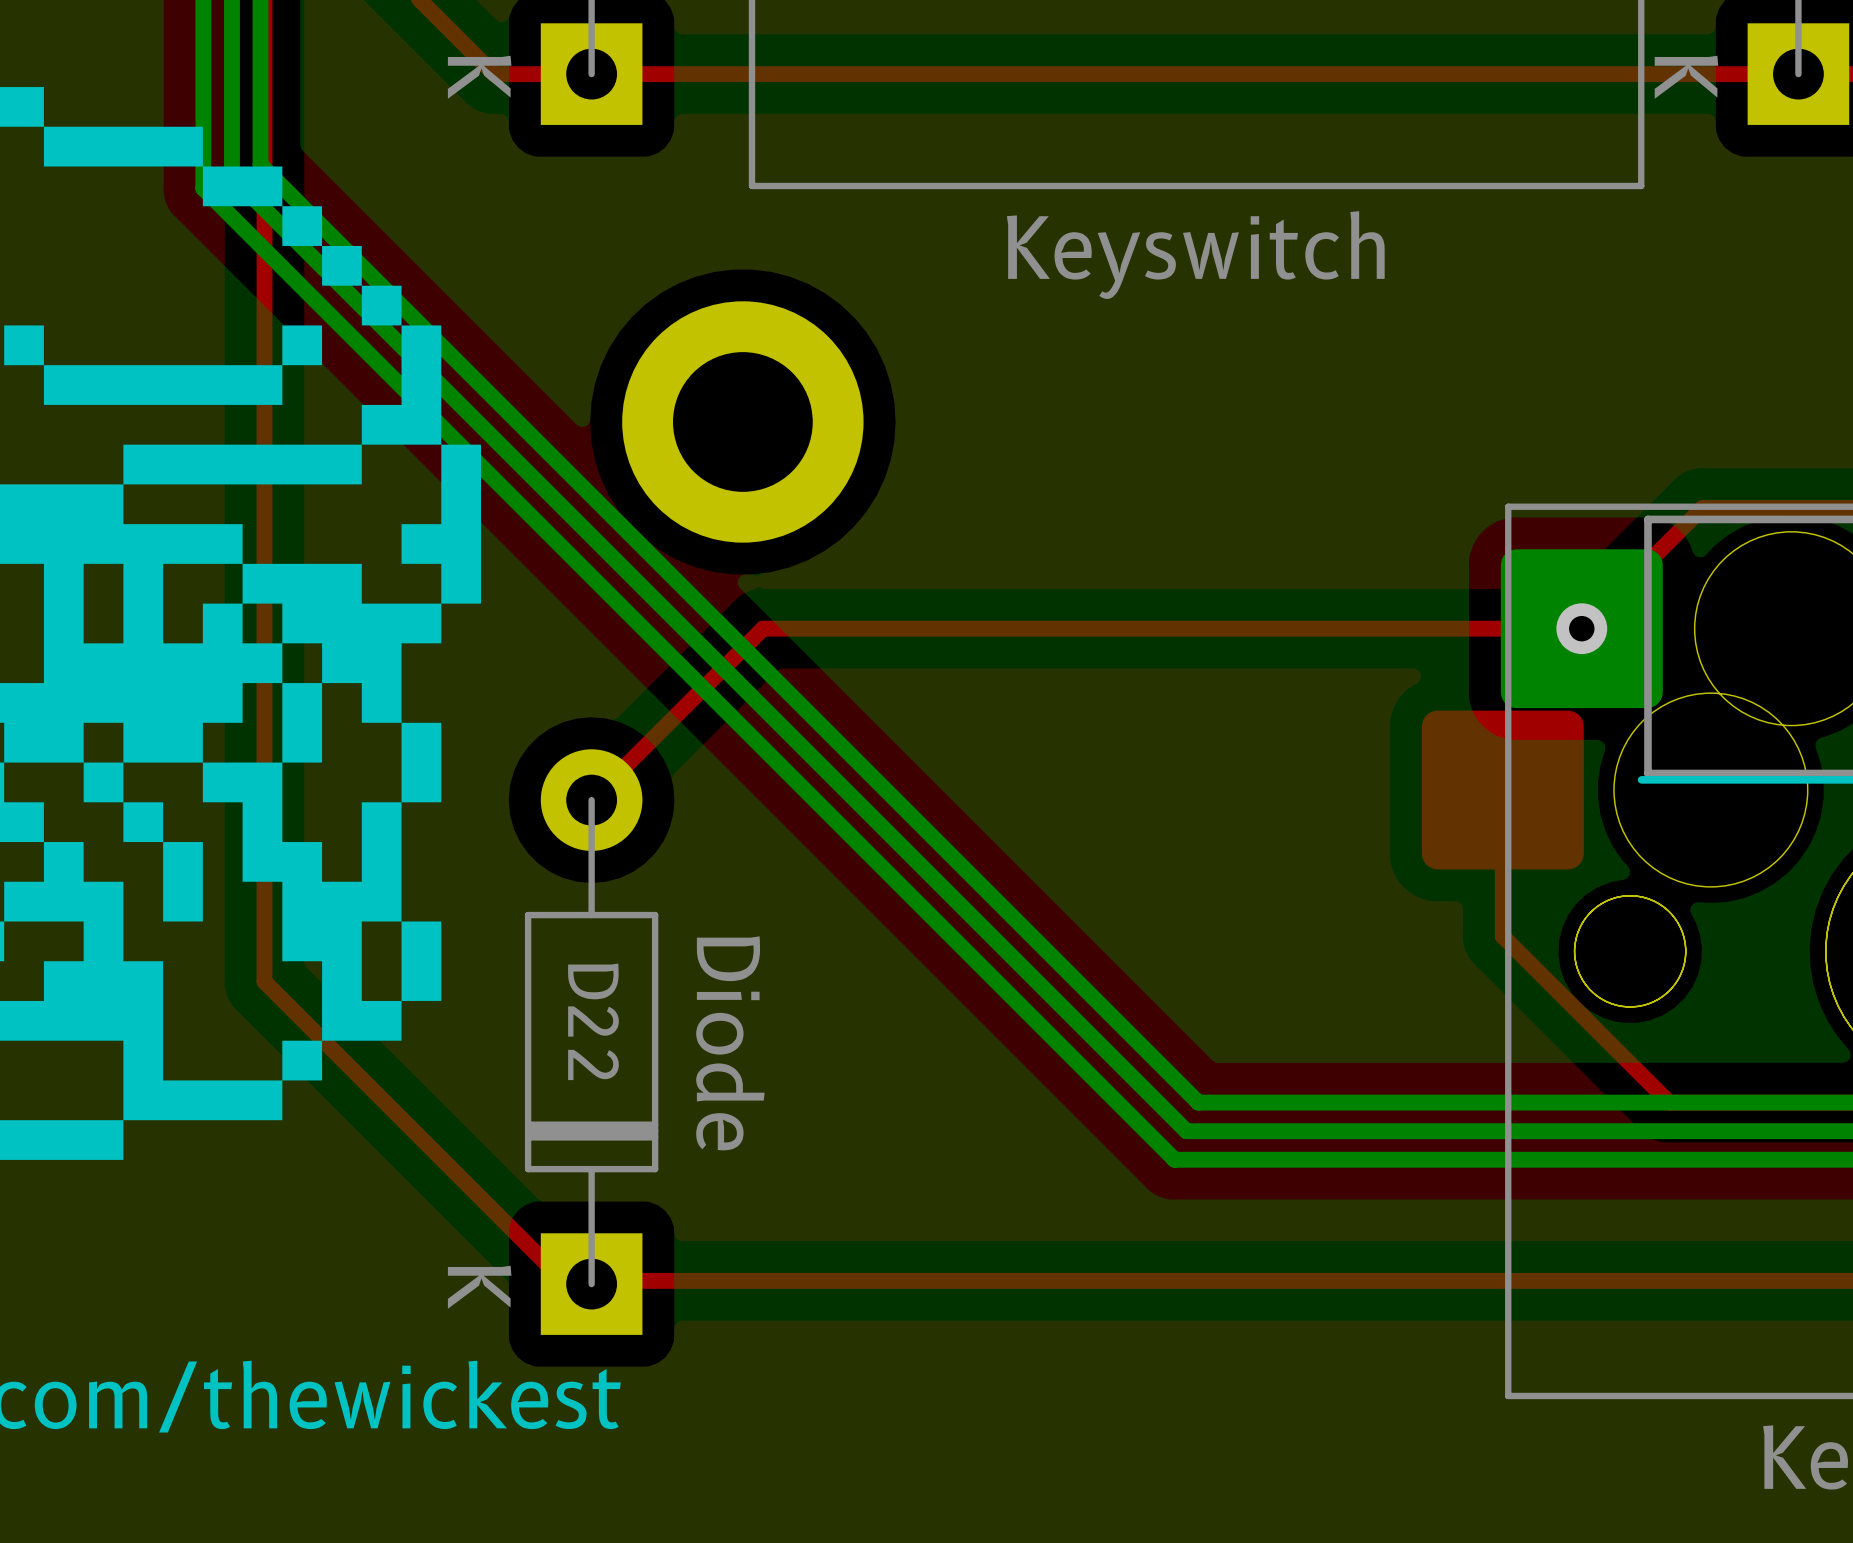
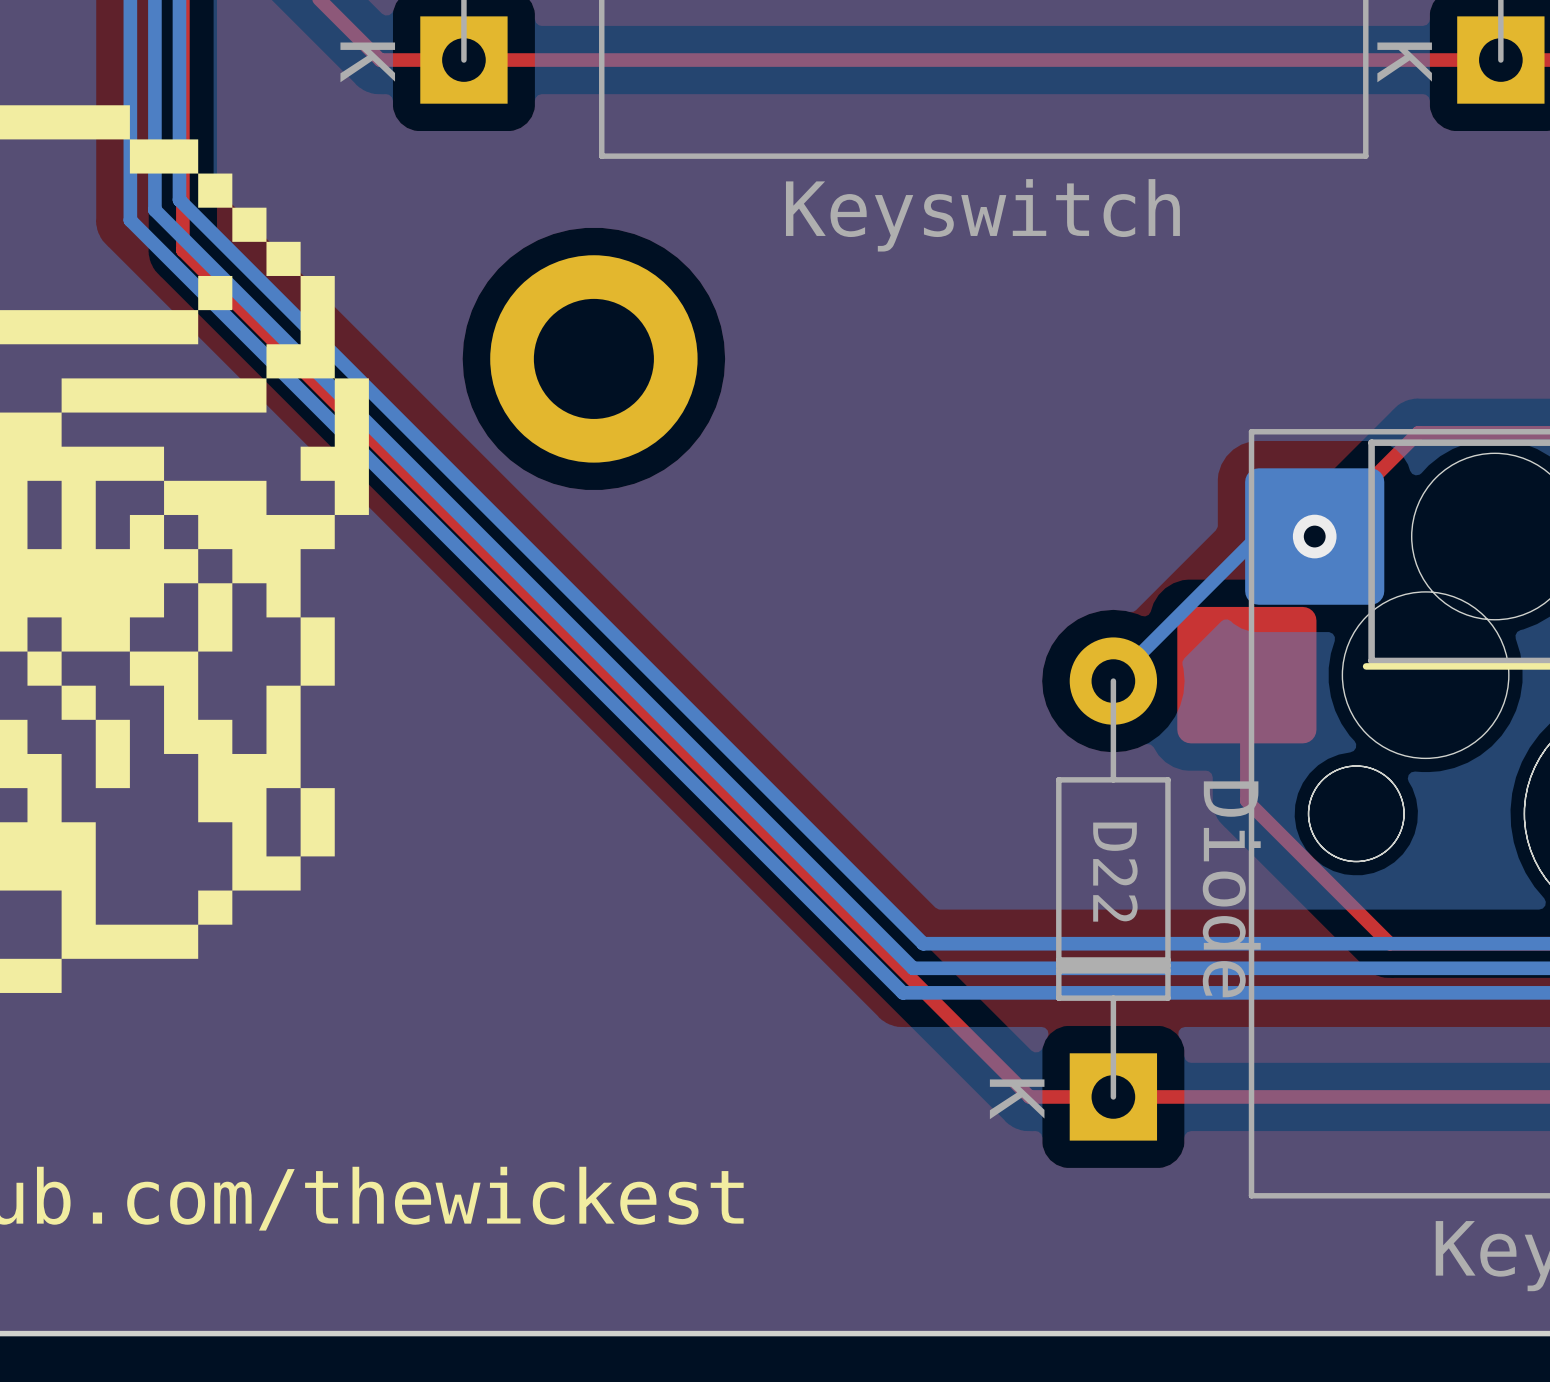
bottom track: (260, 164) (1198, 1102) -> (179, 137) (179, 199) (923, 943) (985, 943)
bottom track: (231, 176) (1186, 1131) -> (154, 148) (154, 210) (913, 968) (975, 968)
bottom track: (203, 188) (1174, 1159) -> (130, 158) (130, 220) (902, 992) (964, 992)
top track: (264, 295) (264, 981) (563, 1280) (1249, 1280) -> (182, 250) (1029, 1096)
bottom track: none -> (1257, 536) (1113, 681)
top track: (1581, 628) (763, 628) (591, 800) -> none
D22 position: (591, 1042) -> (1113, 889)

